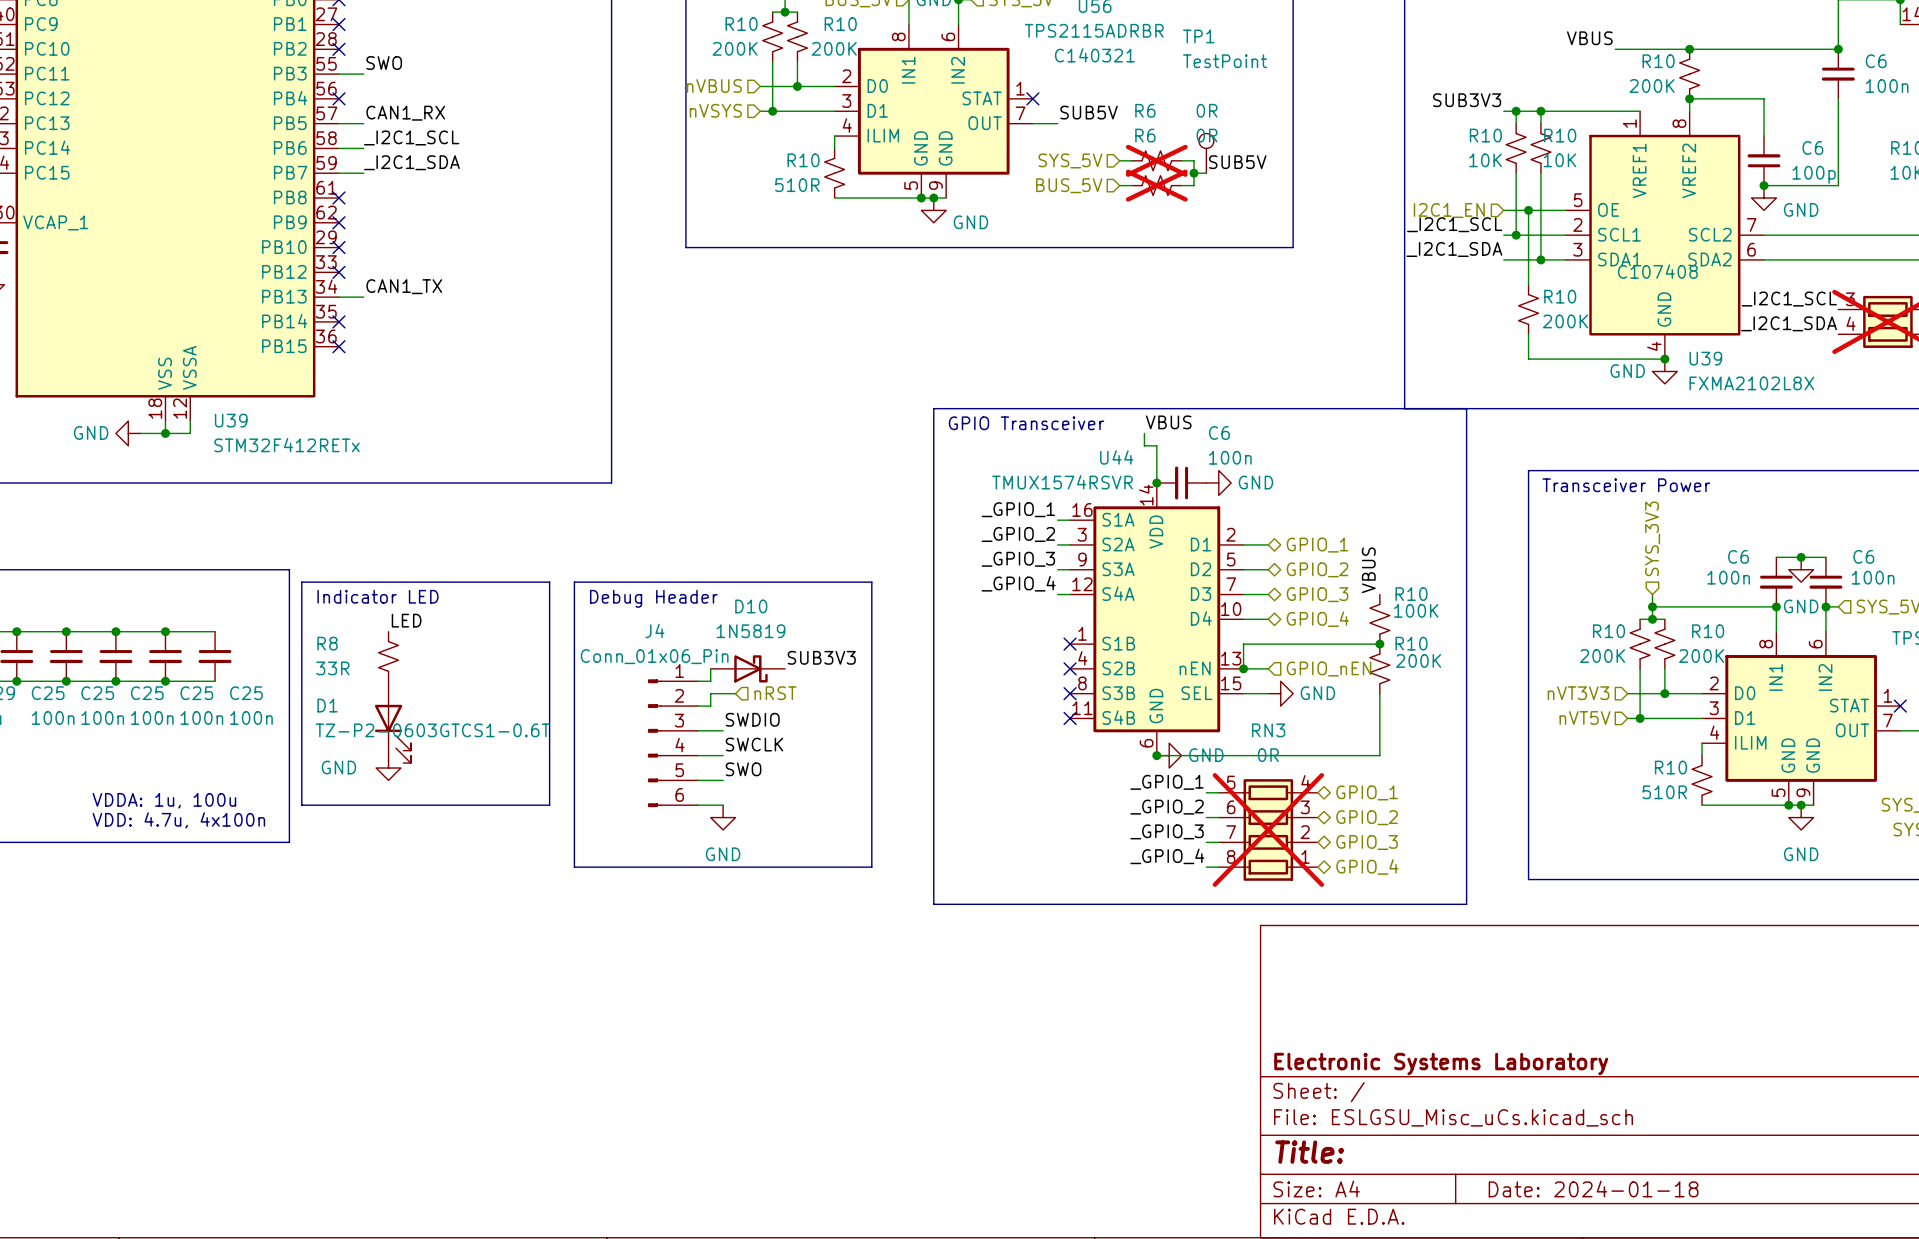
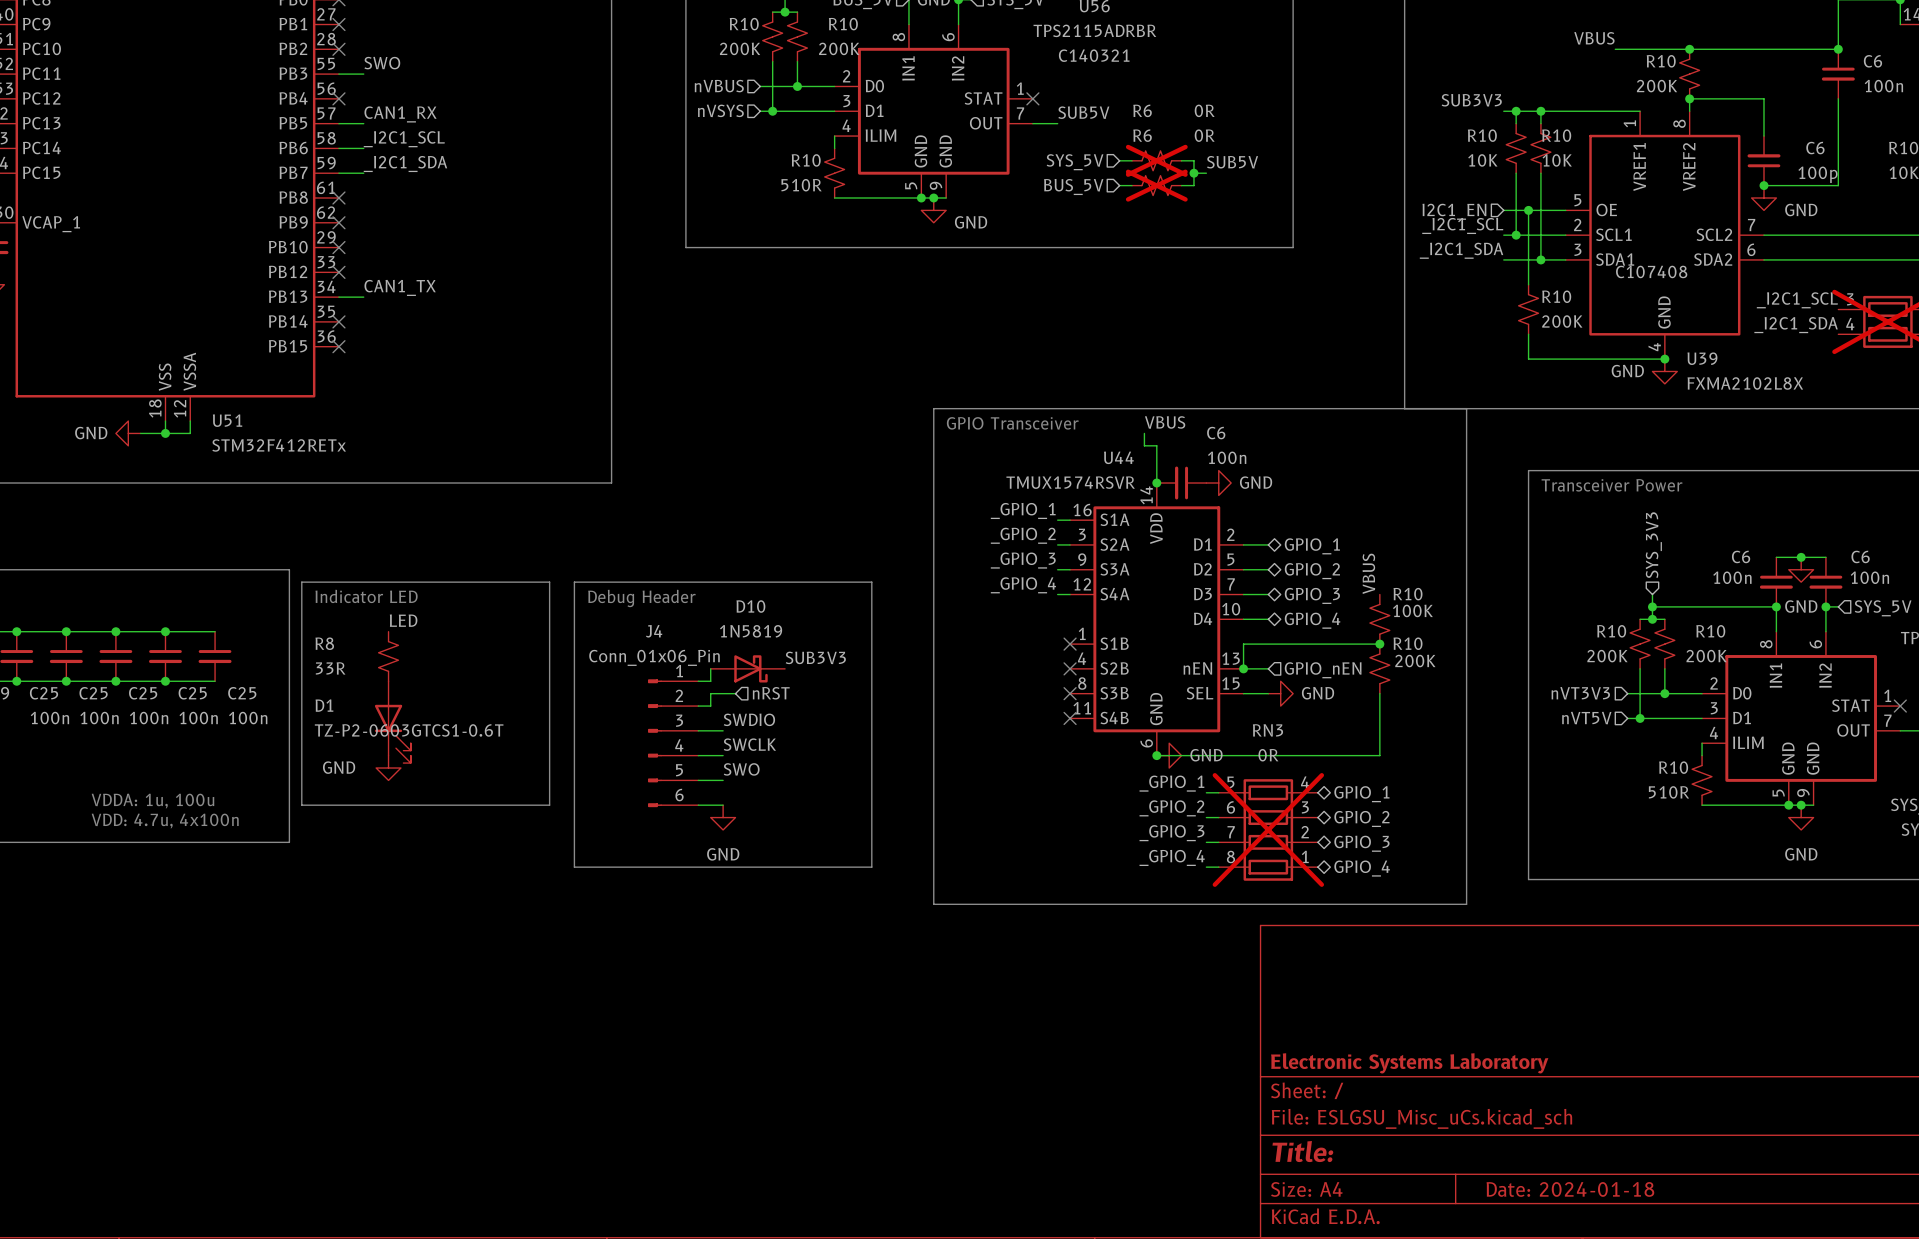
TP1: TestPoint (1206, 153) -> none
U39 name: U39 (231, 420) -> U51 (227, 420)

